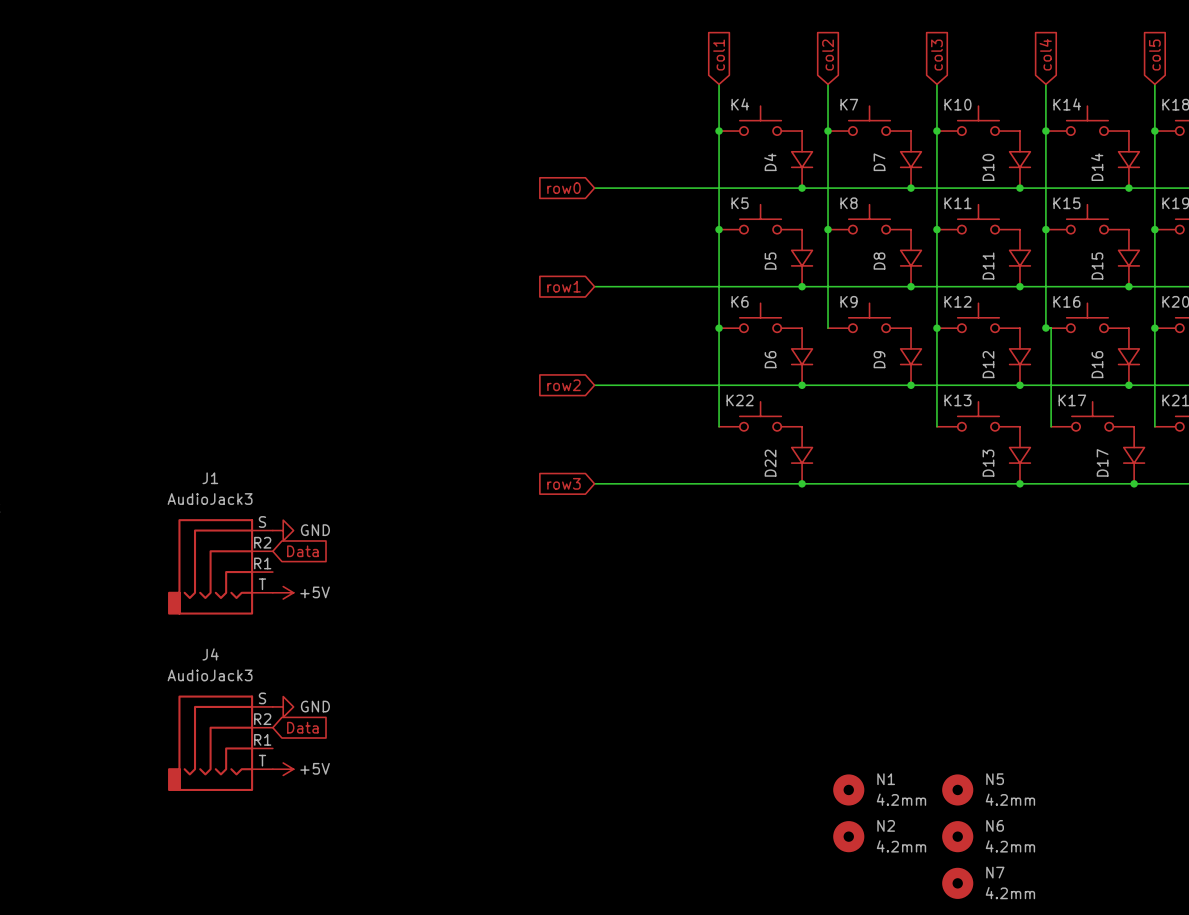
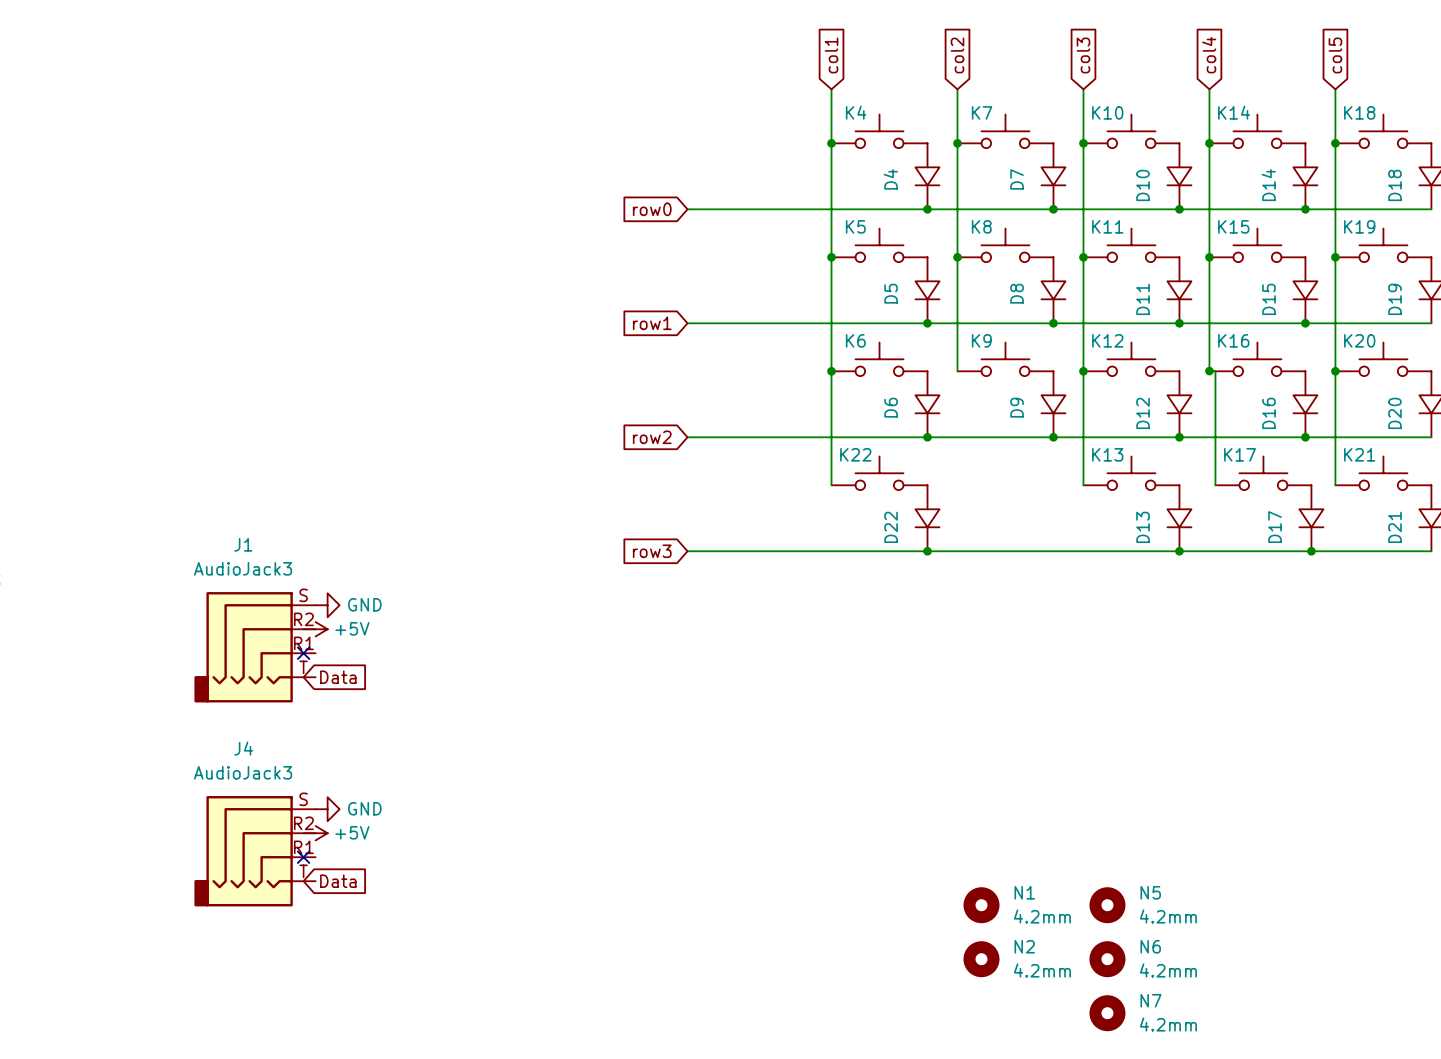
global label position: Data (302, 551) -> Data (338, 677)
no-connect mark: none -> (303, 653)
power symbol position: +5V (283, 592) -> +5V (315, 629)
global label position: Data (302, 727) -> Data (338, 881)
no-connect mark: none -> (303, 857)
power symbol position: +5V (283, 769) -> +5V (315, 833)

